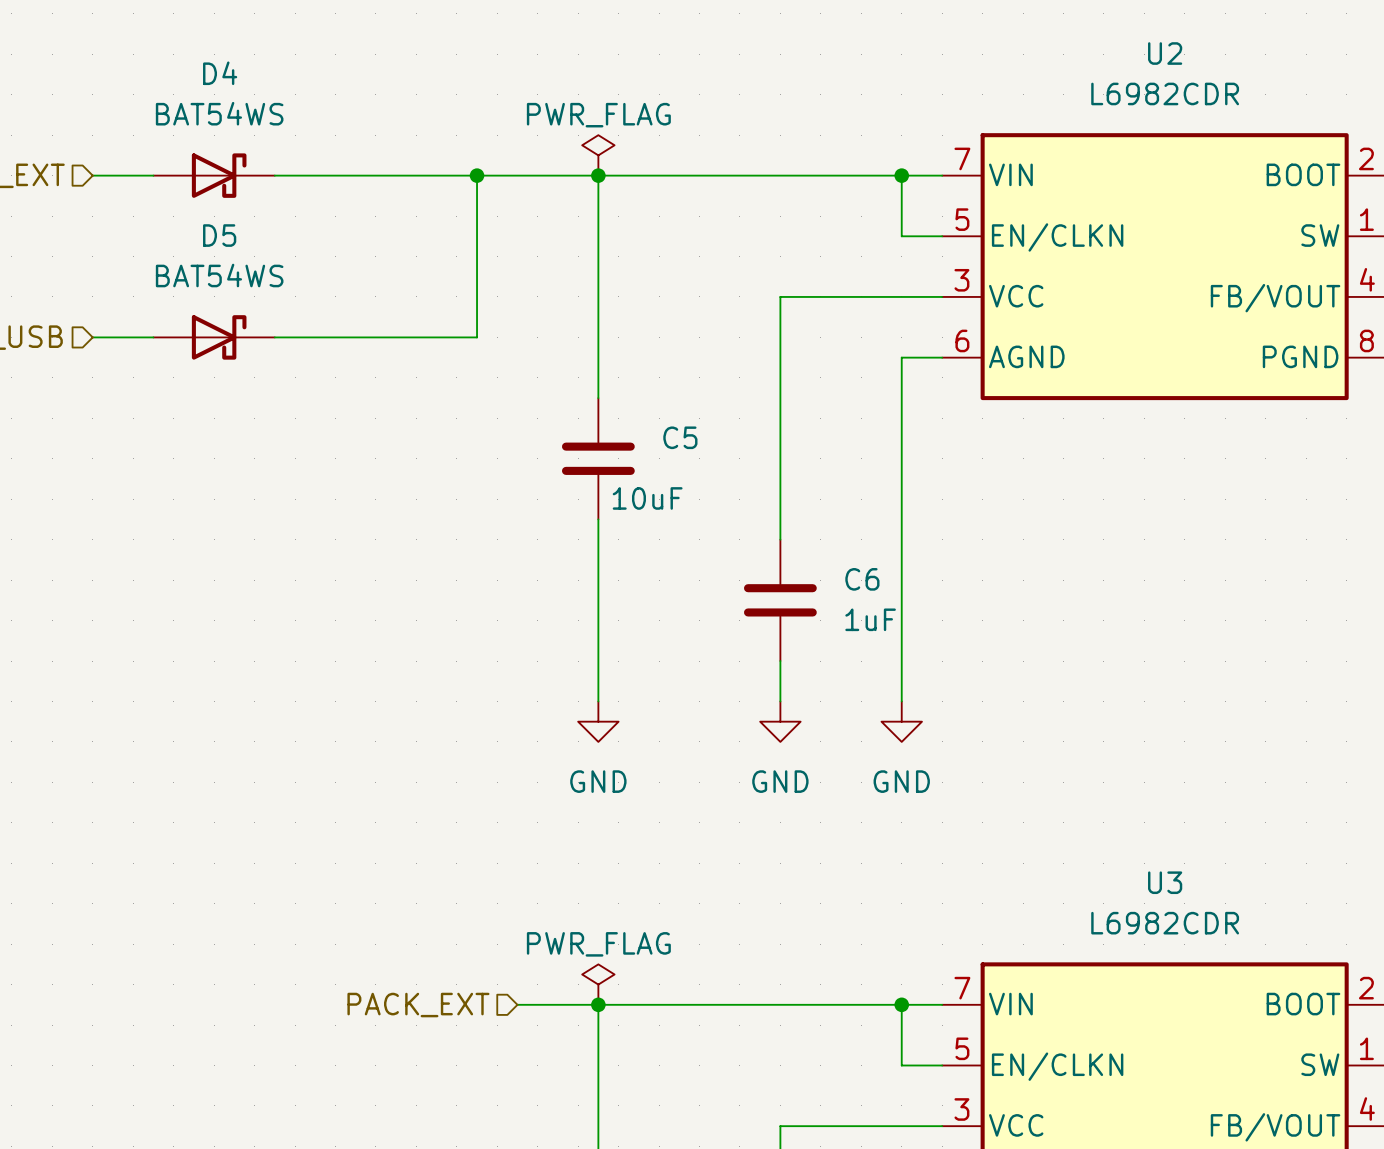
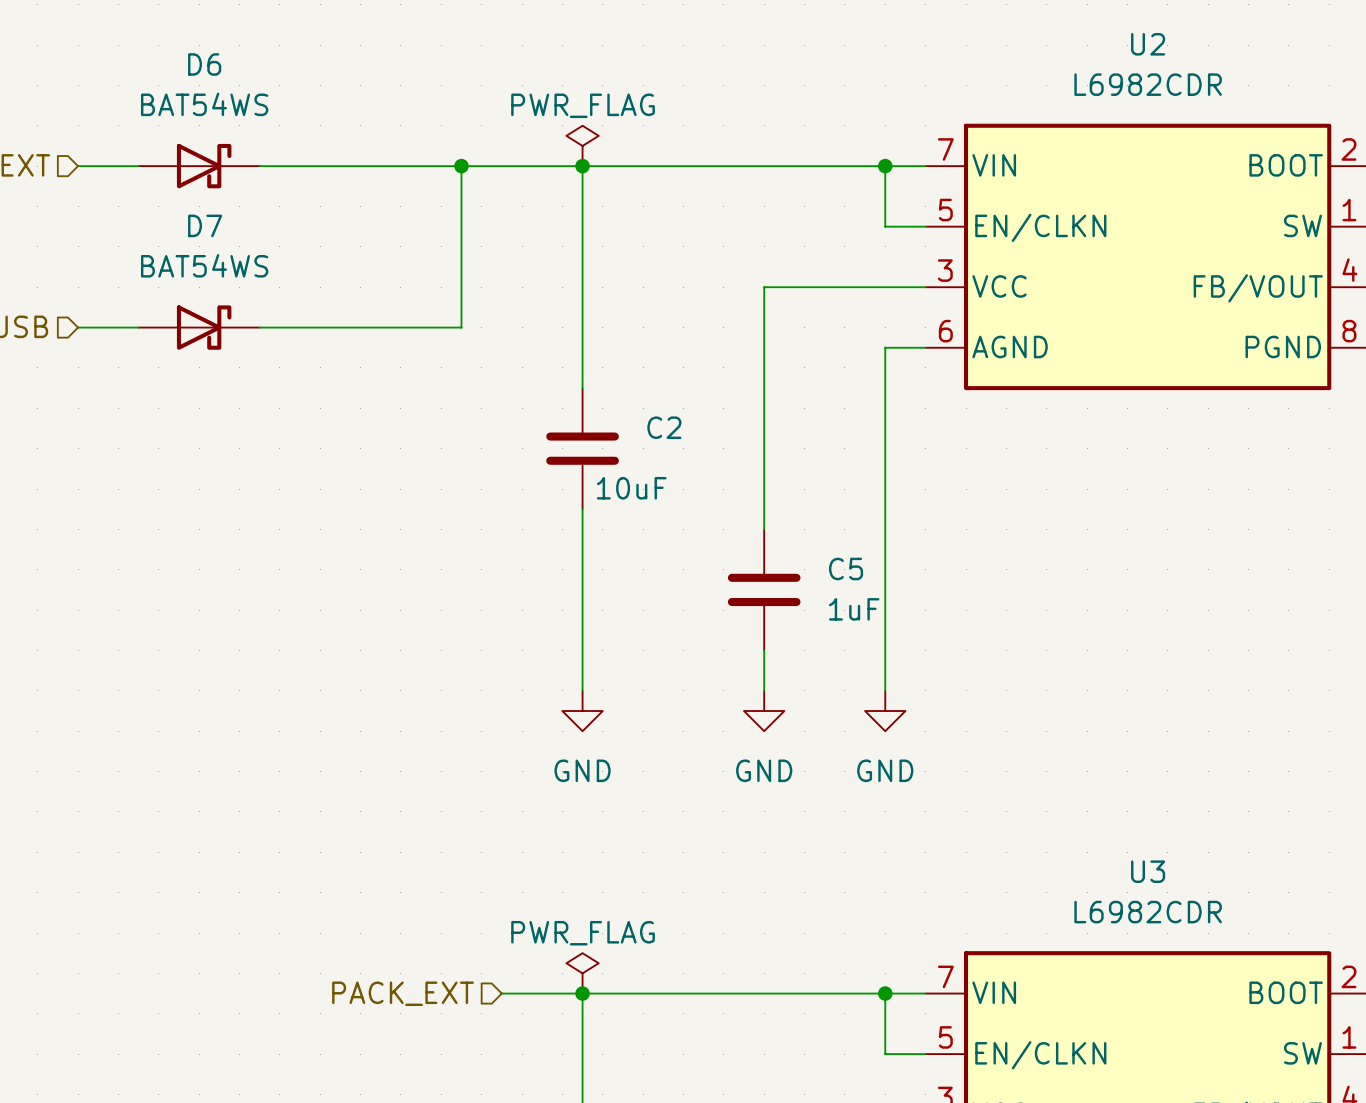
D4 name: D4 (220, 73) -> D6 (204, 64)
D5 name: D5 (219, 235) -> D7 (205, 225)
C5 name: C5 (680, 437) -> C2 (664, 427)
C6 name: C6 (862, 579) -> C5 (846, 568)

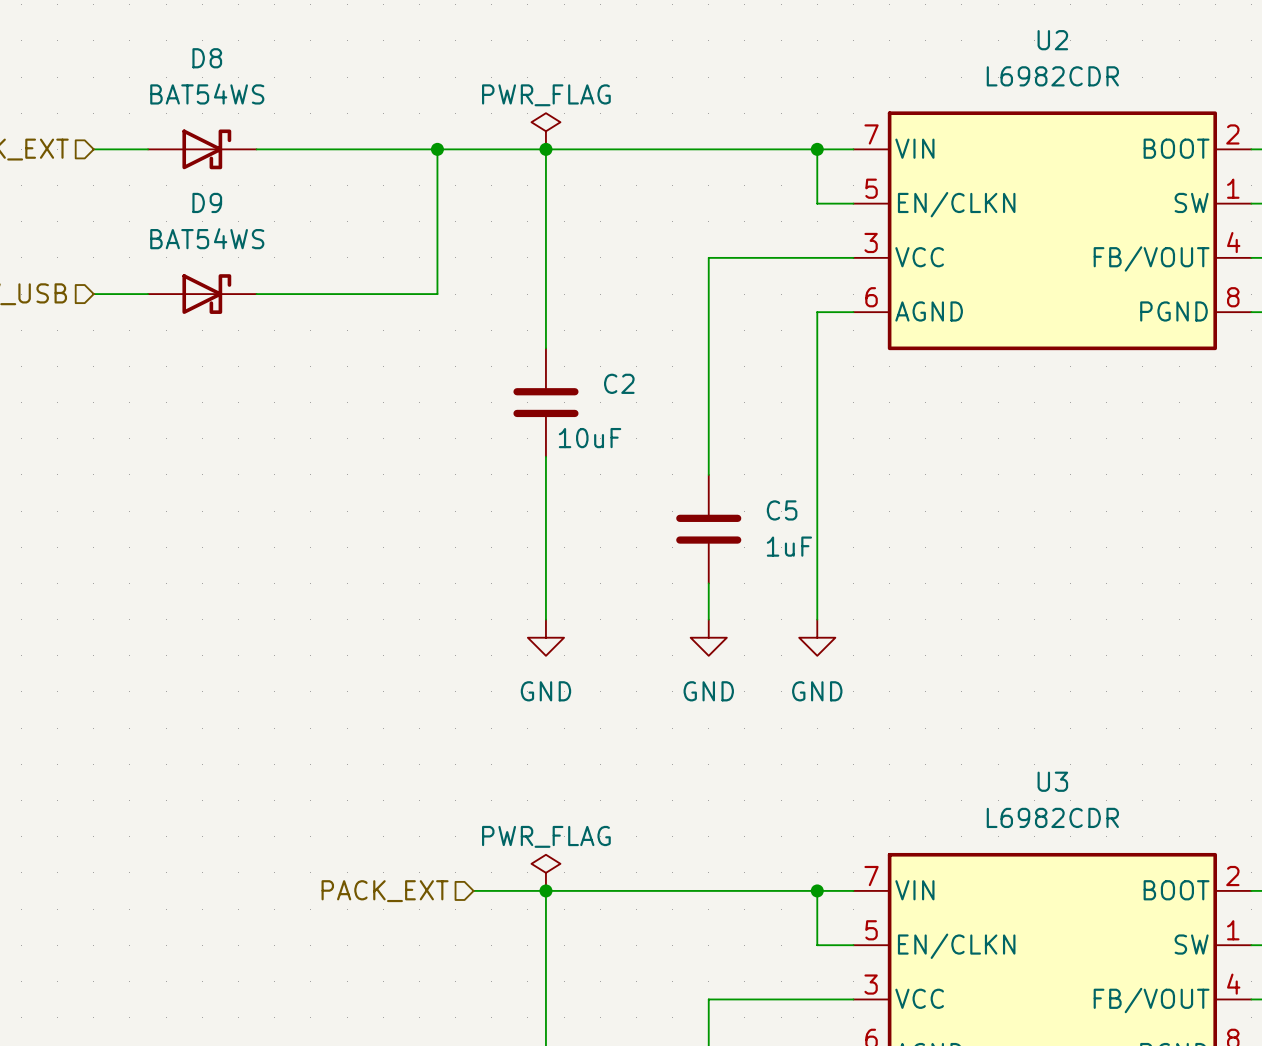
D6 name: D6 (204, 64) -> D8 (207, 58)
D7 name: D7 (205, 225) -> D9 (207, 202)

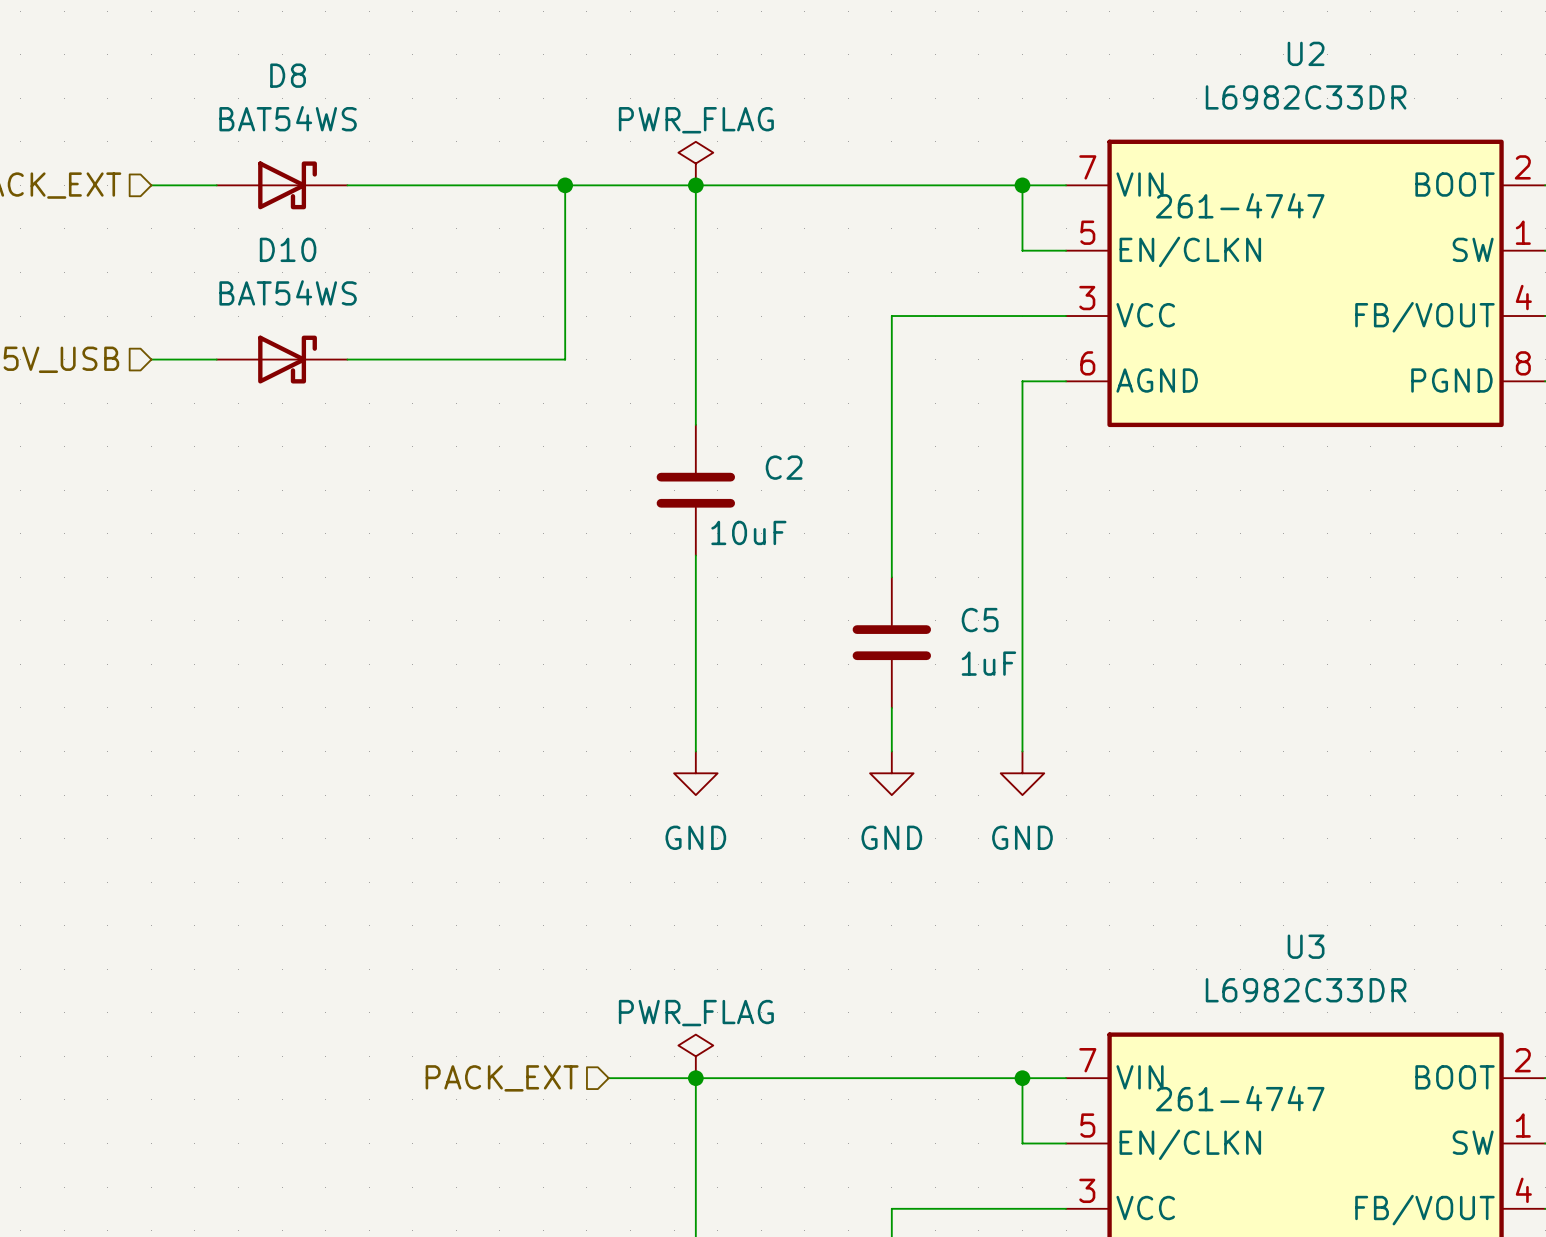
U2 value: L6982CDR (1052, 76) -> L6982C33DR (1306, 97)
U2 text: none -> 261-4747 (1240, 205)
D9 name: D9 (207, 202) -> D10 (288, 249)
U3 value: L6982CDR (1052, 817) -> L6982C33DR (1306, 990)
U3 text: none -> 261-4747 (1240, 1098)

